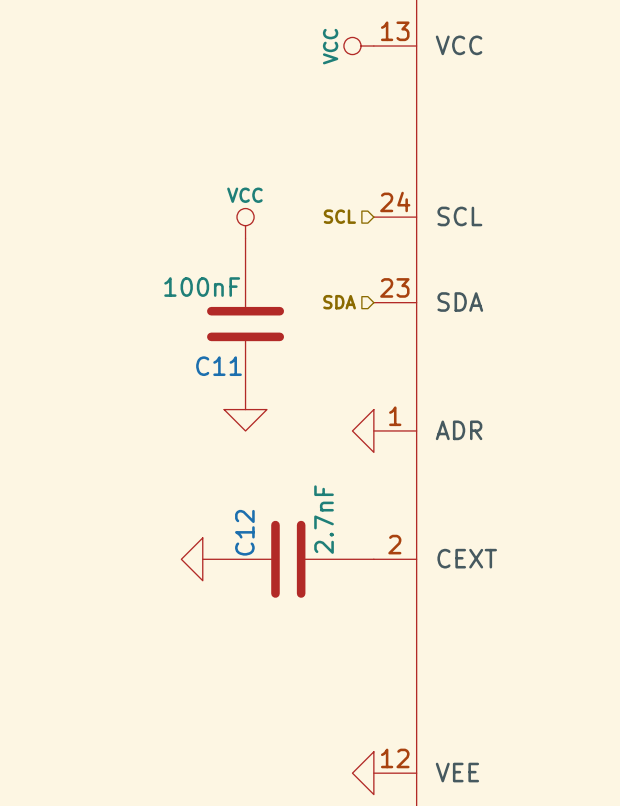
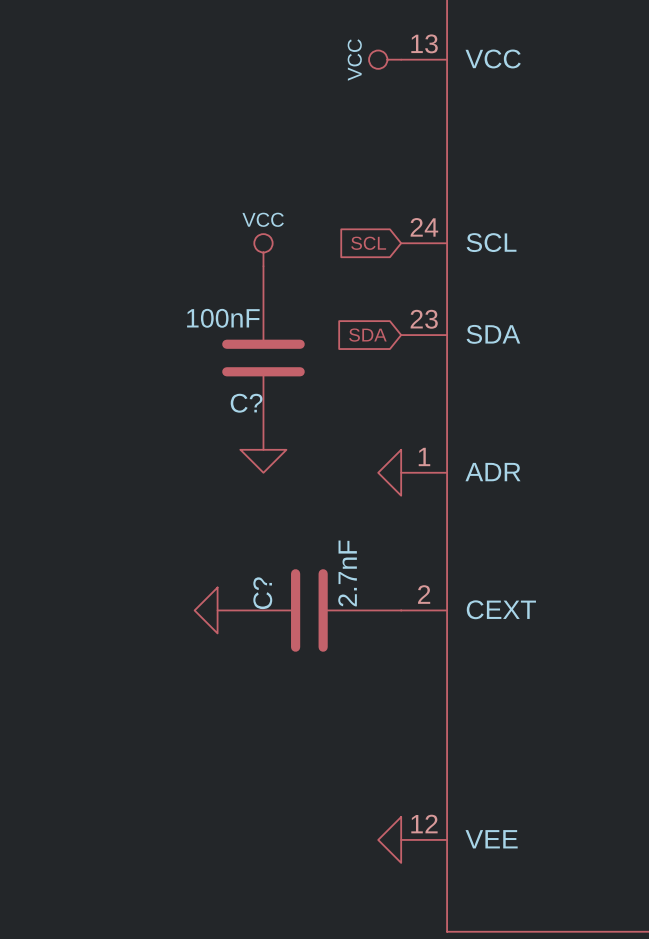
hierarchical label: SCL (339, 216) -> none
global label: none -> SCL (368, 243)
hierarchical label: SDA (339, 302) -> none
global label: none -> SDA (367, 335)
C11 name: C11 (219, 366) -> C? (246, 403)
C12 name: C12 (244, 532) -> C? (262, 593)

